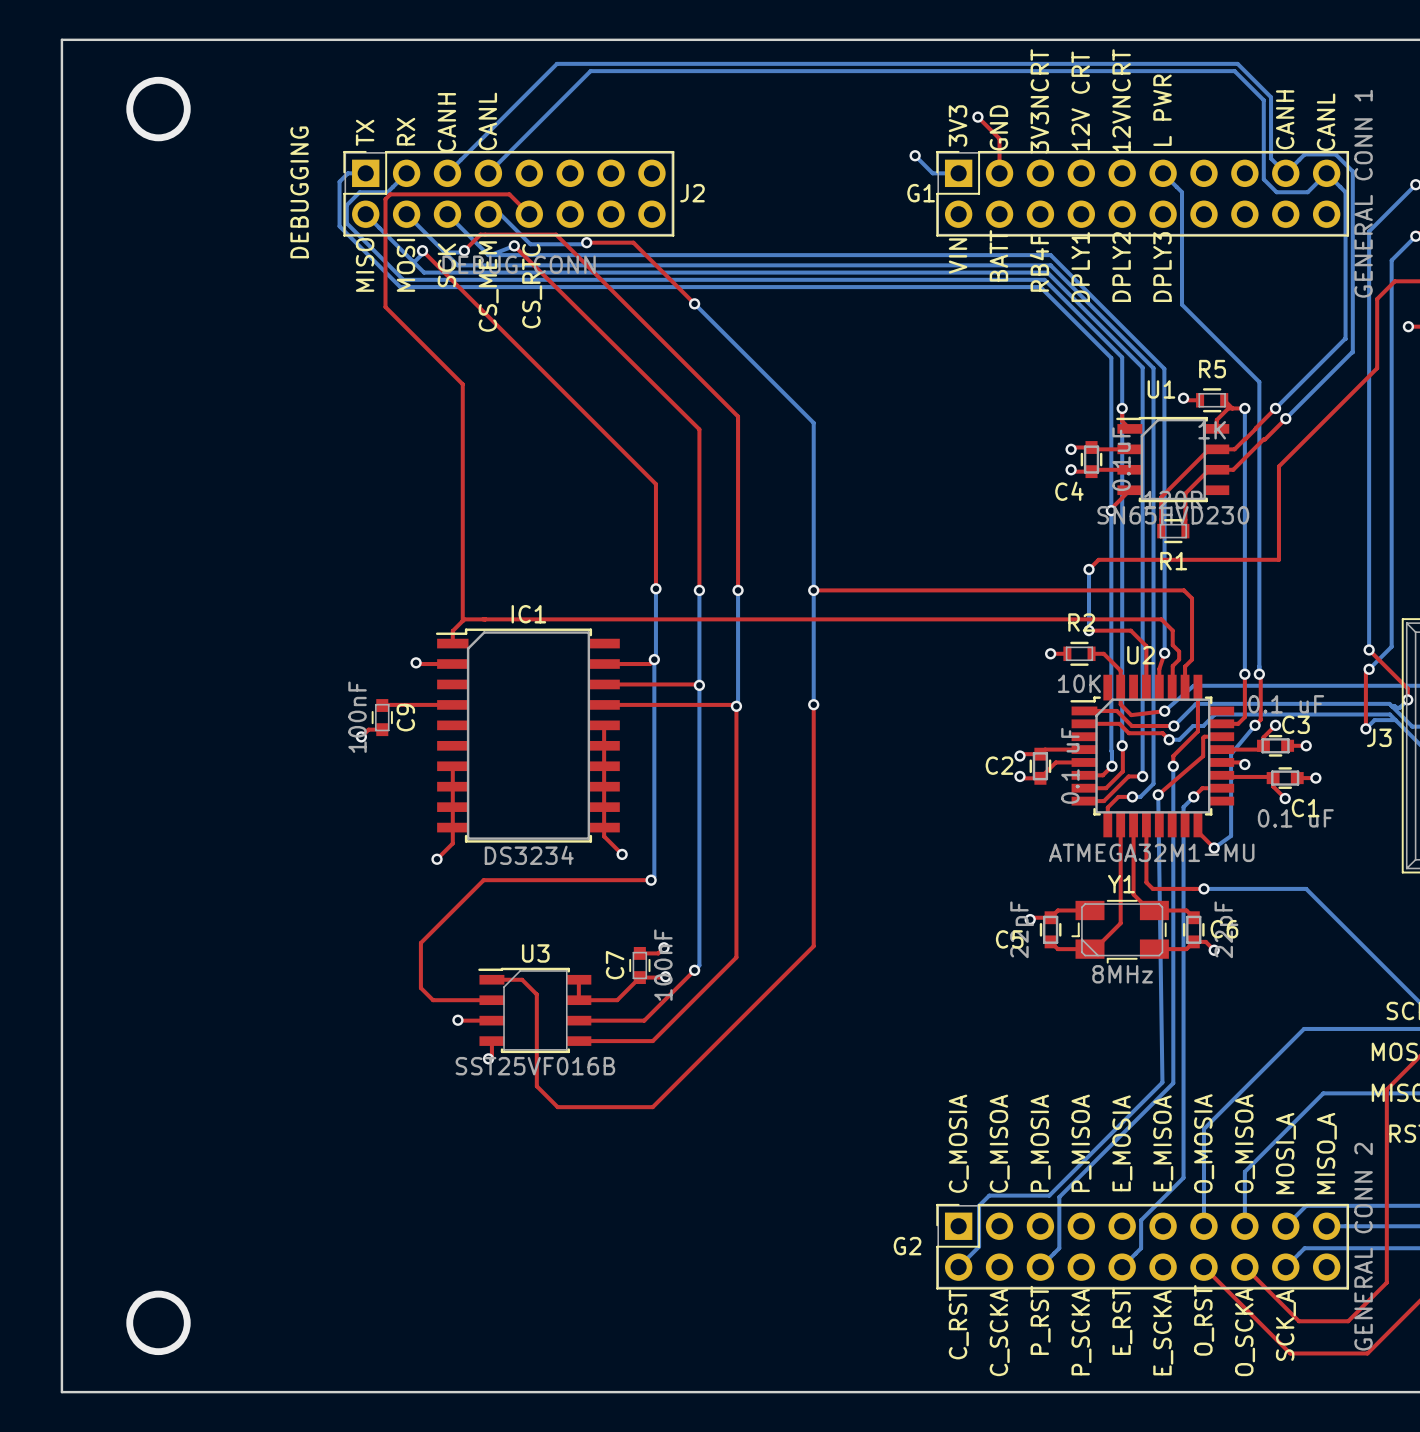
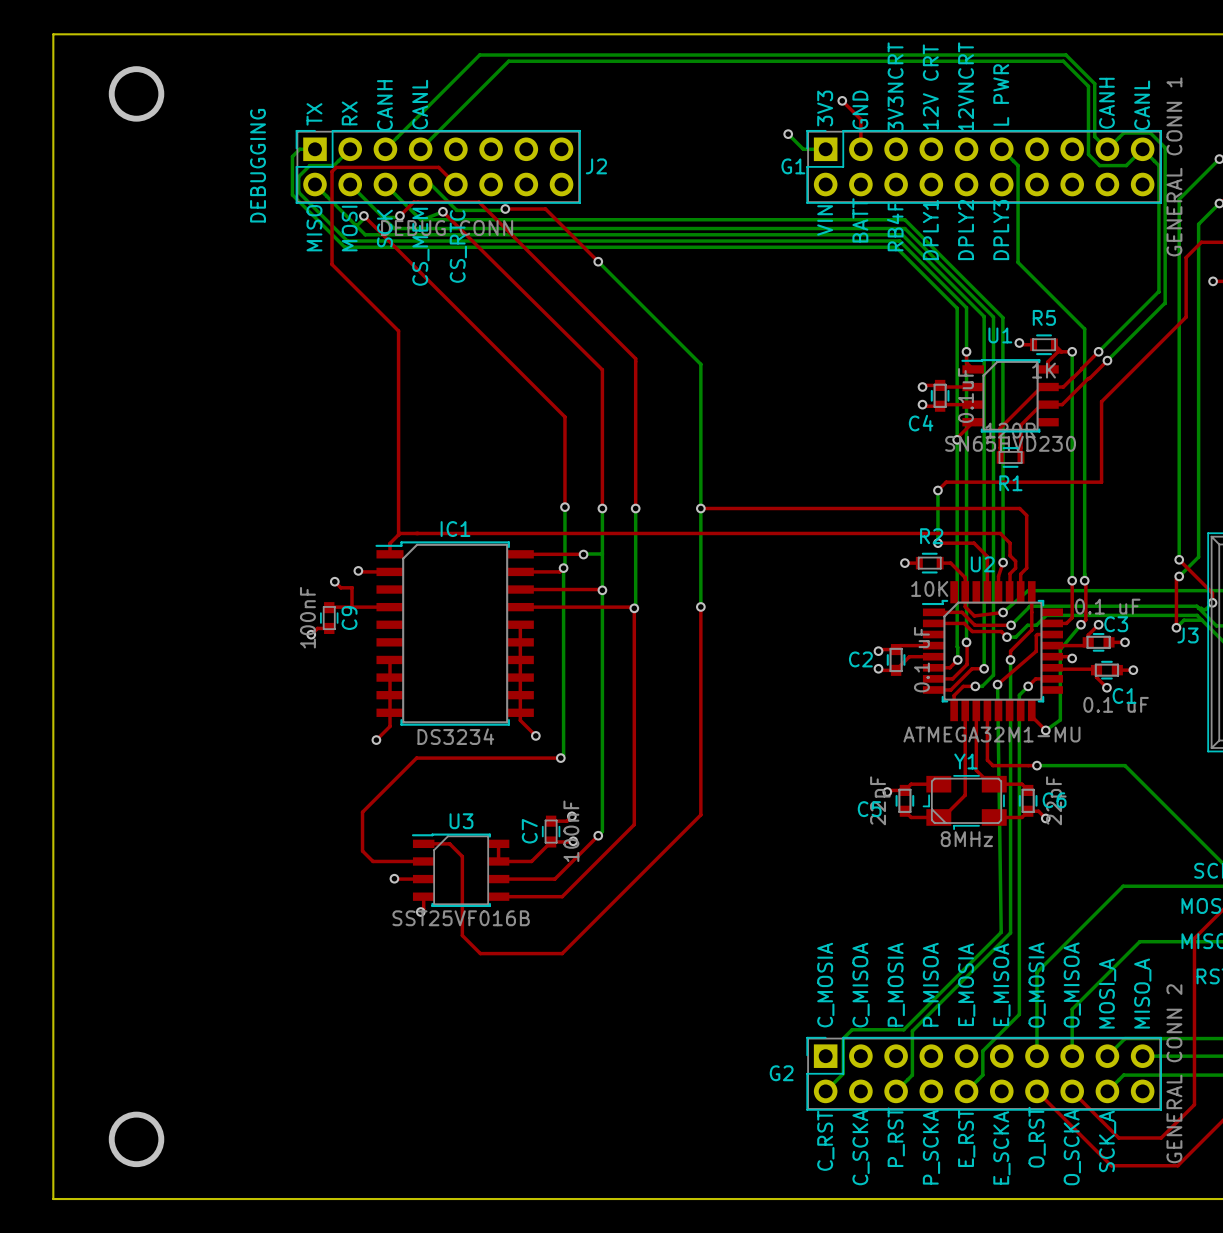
top track: none -> (520, 554) (583, 554)
via: none -> (583, 554)
bottom track: none -> (602, 553) (583, 554)
top track: none -> (334, 581) (340, 587) (351, 587) (351, 607)
via: none -> (334, 581)

